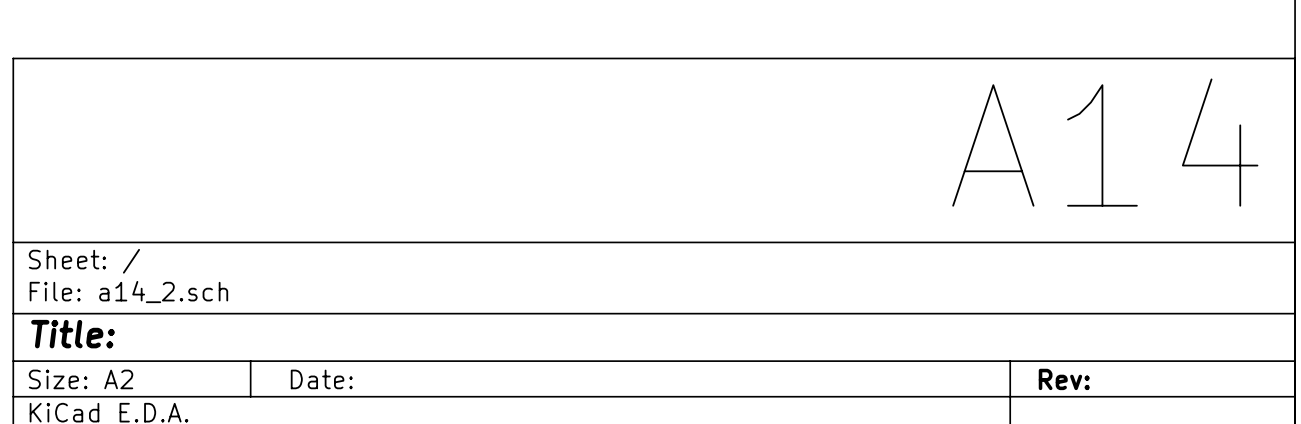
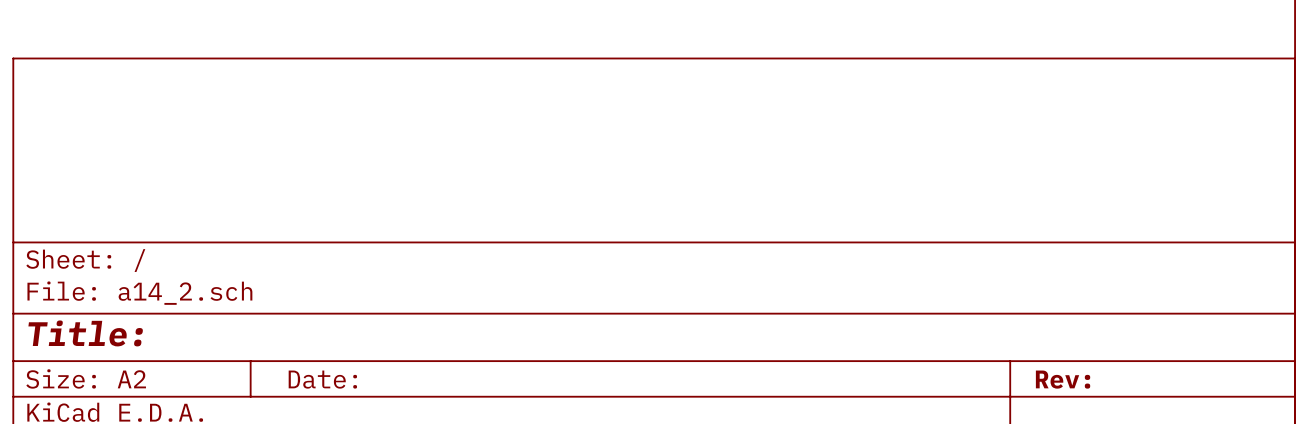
text: A14 (1105, 142) -> none

